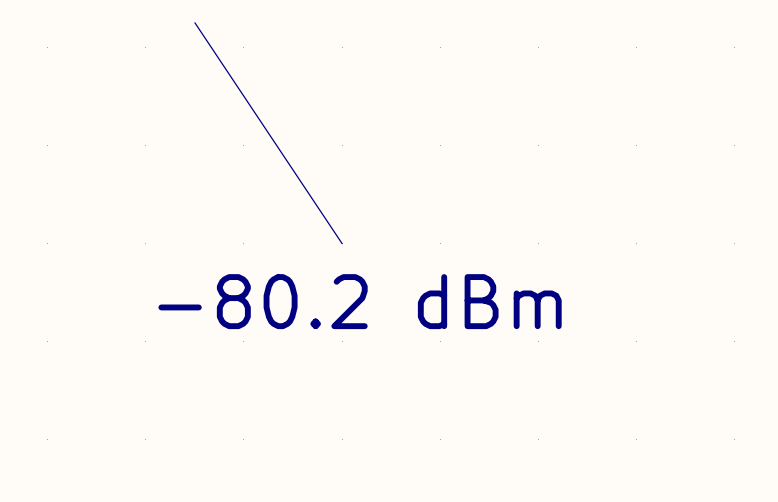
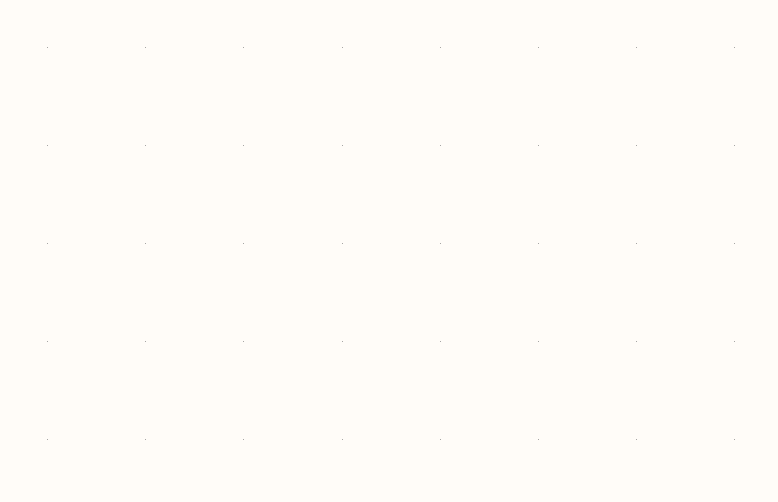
line: (194, 22) (342, 243) -> none
text: -80.2 dBm (360, 301) -> none

